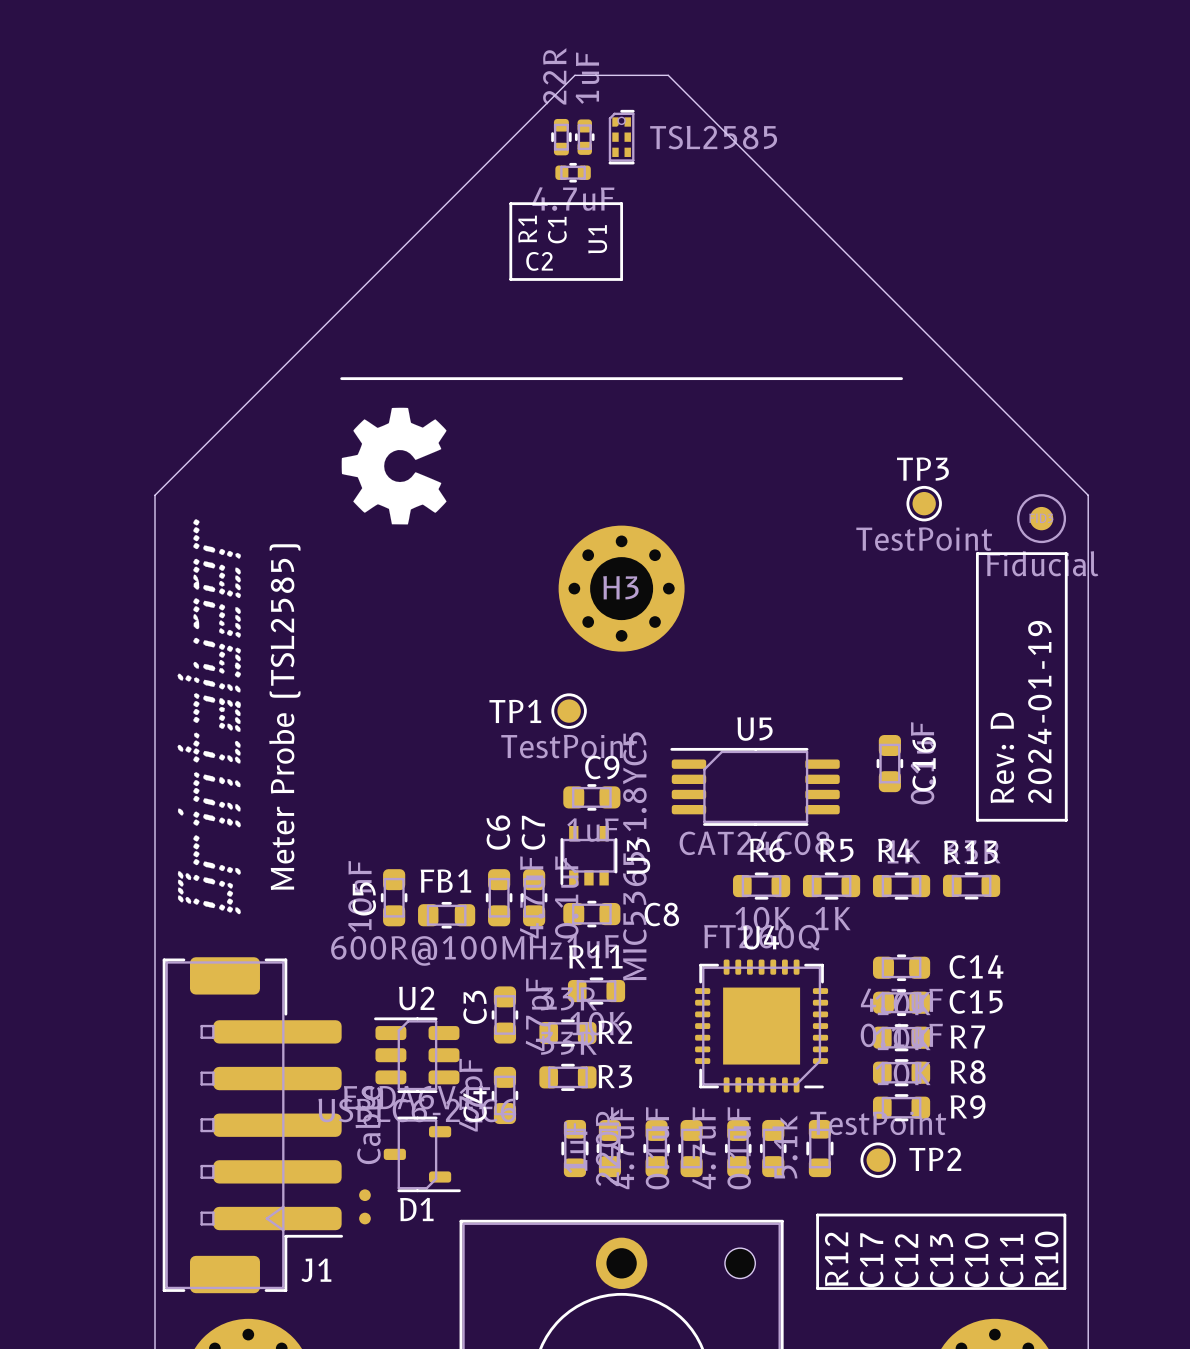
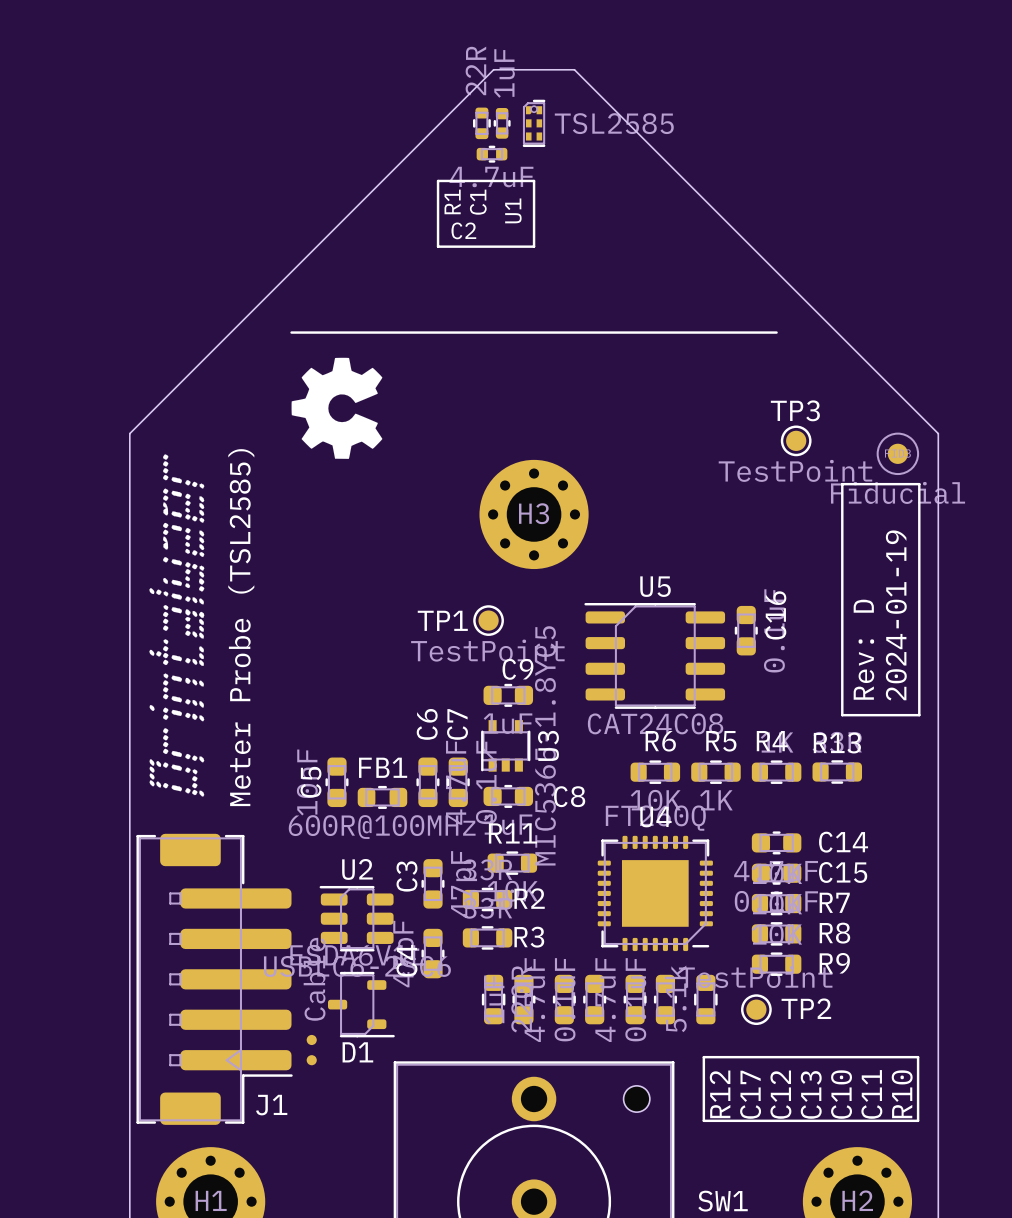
U5 footprint: [670, 747, 840, 826] -> [584, 602, 726, 709]
C16 position: (889, 763) -> (746, 630)
C16 name position: C16 (924, 764) -> C16 (775, 615)

